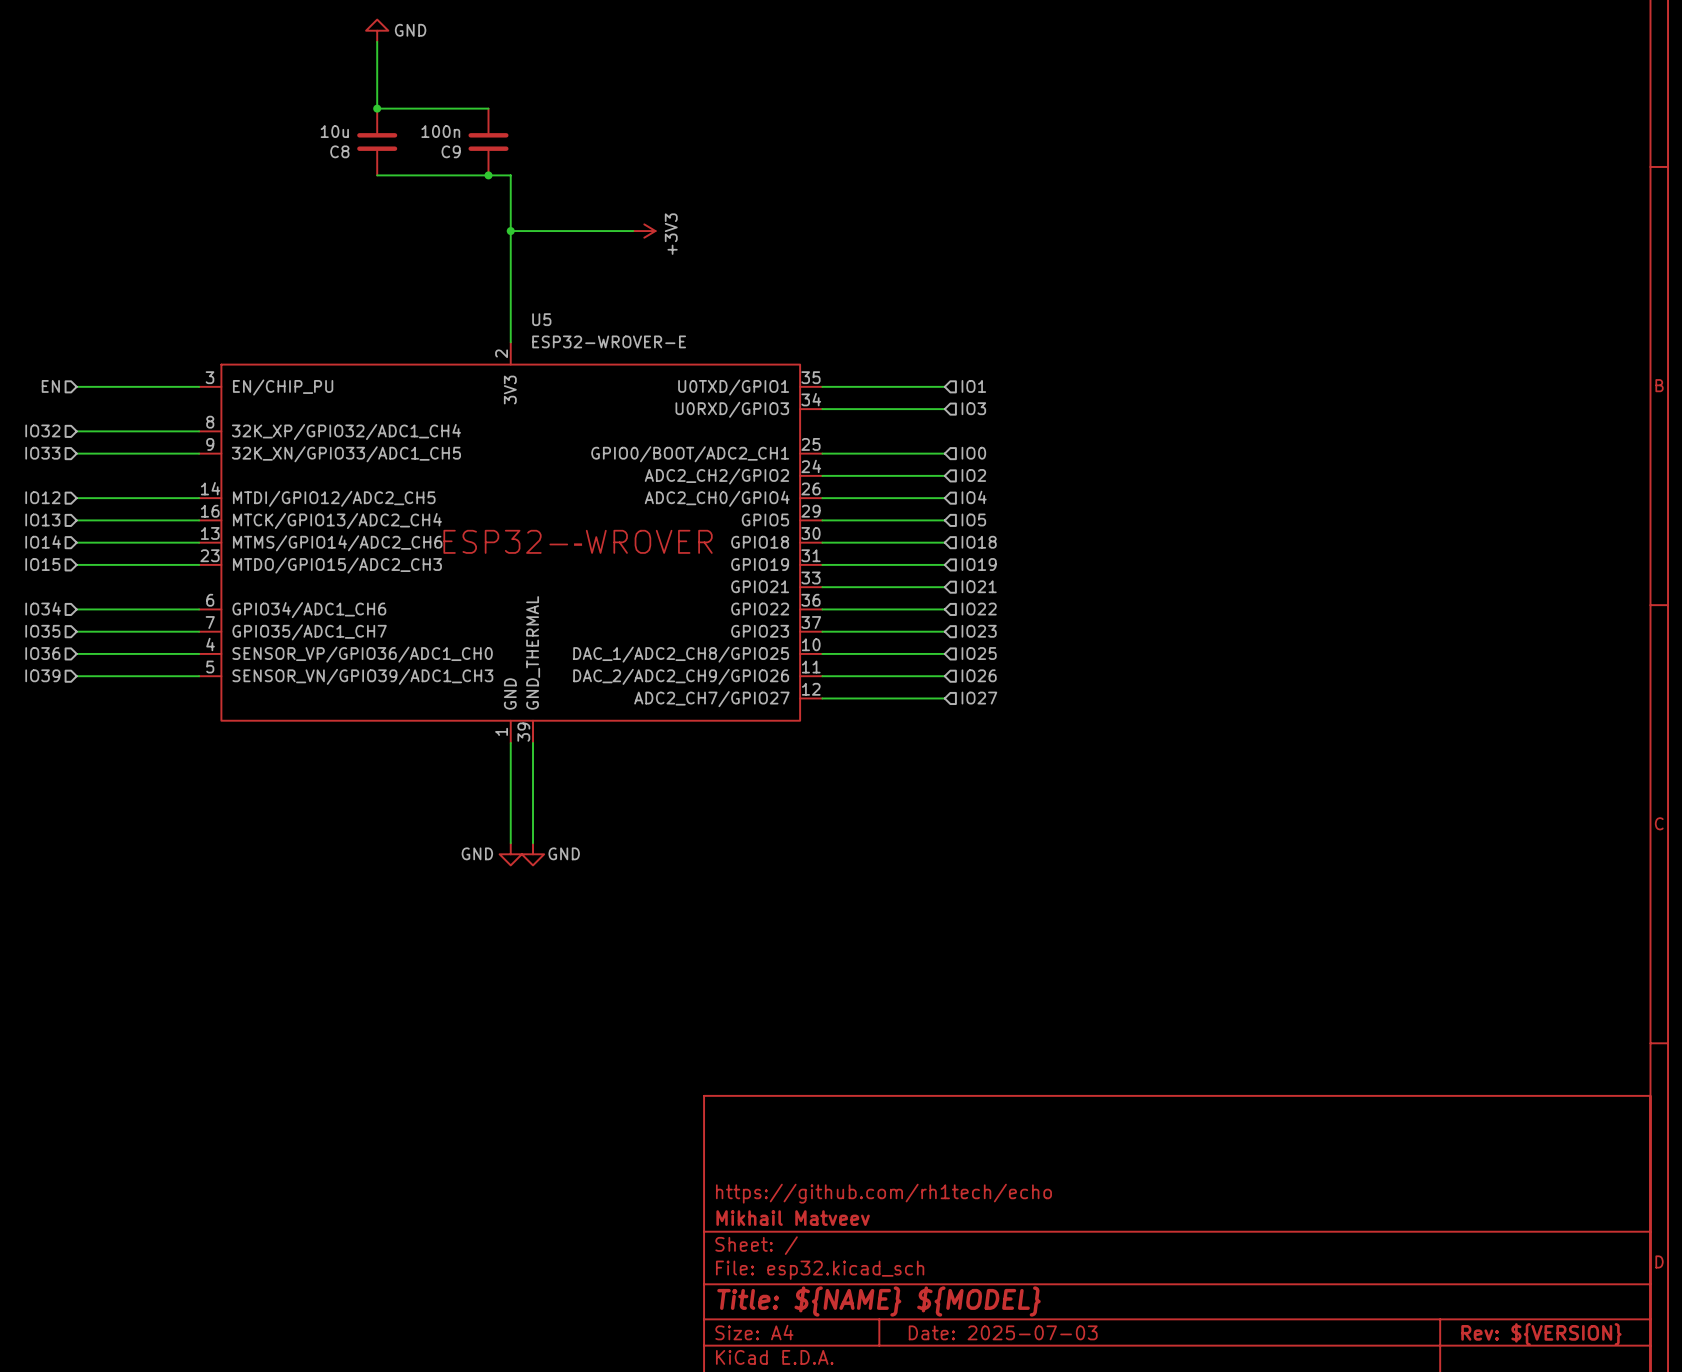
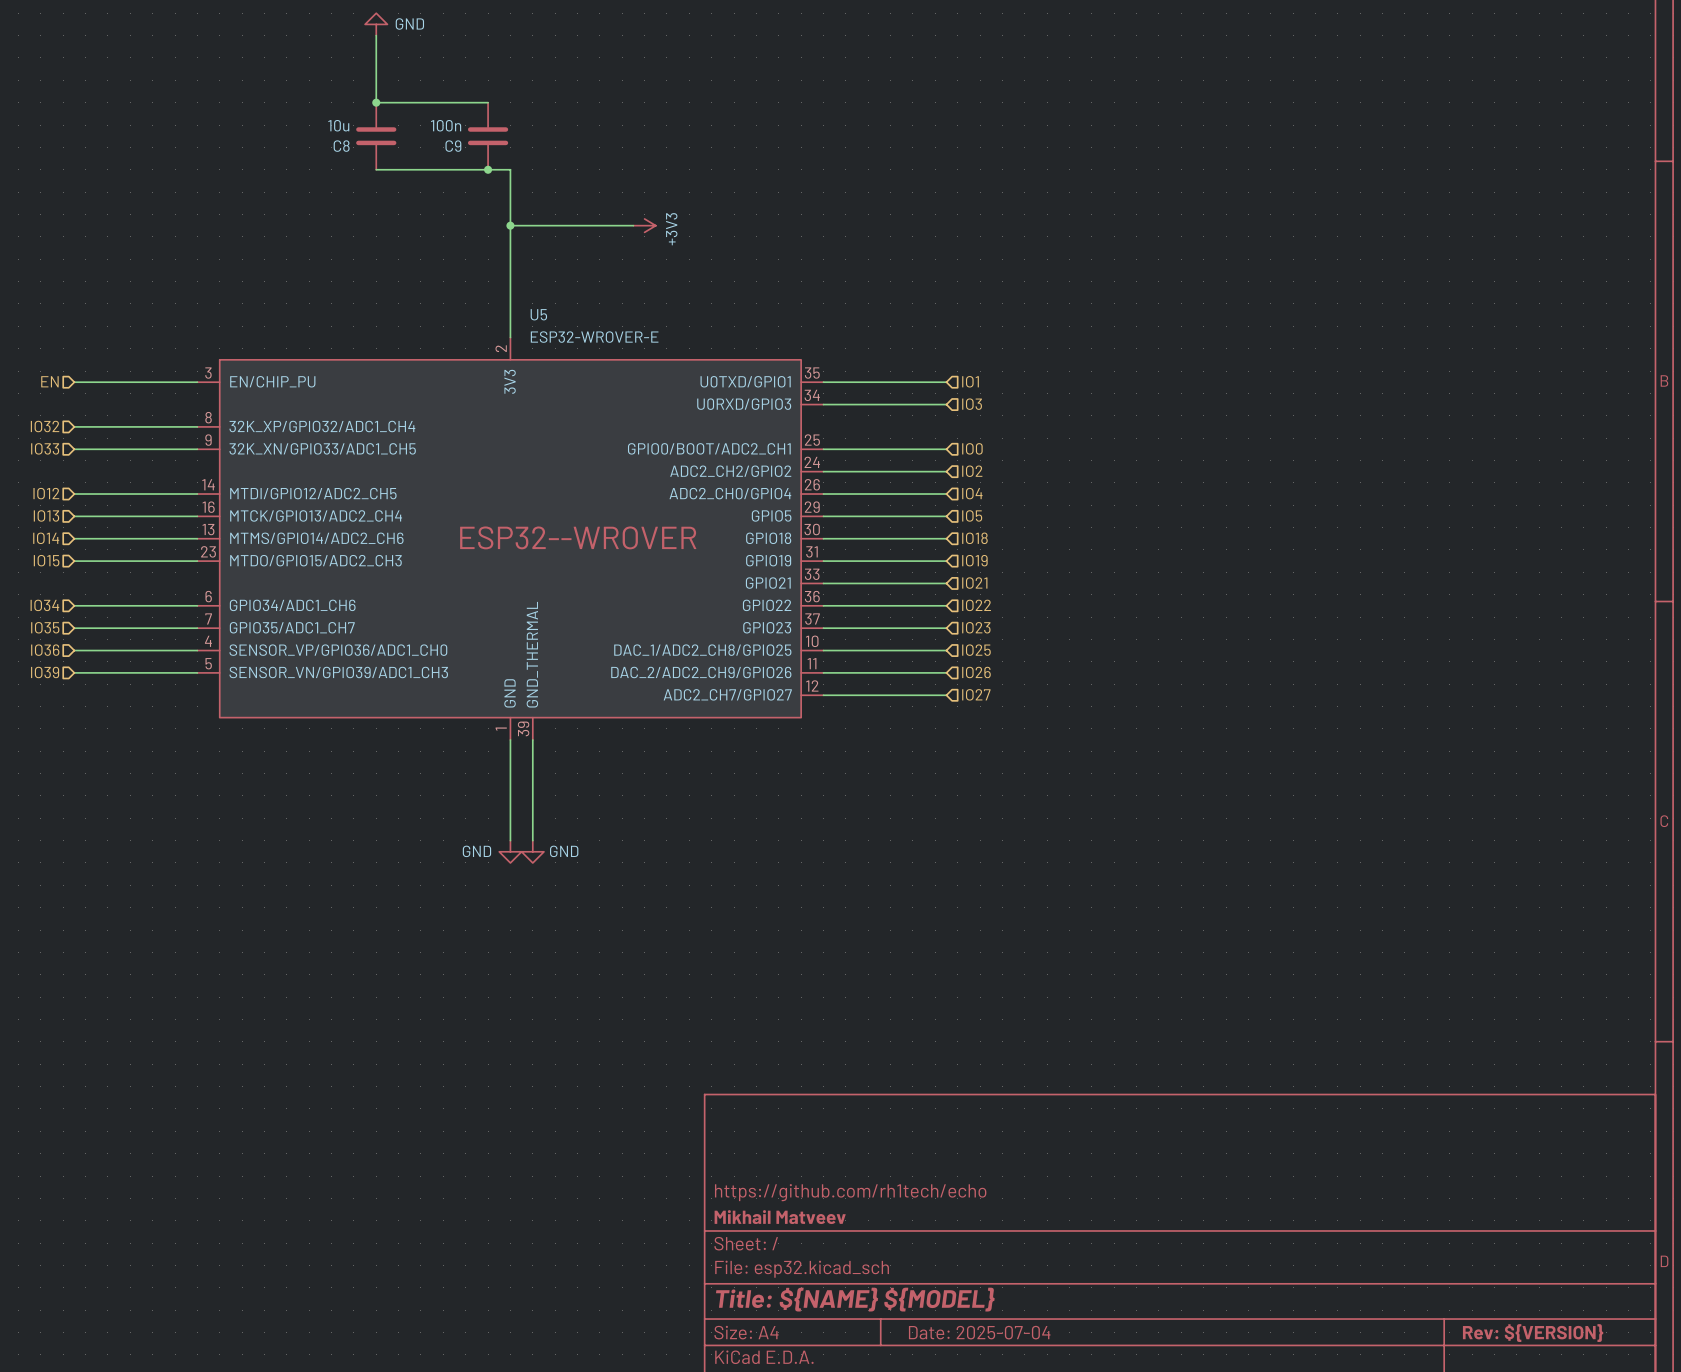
title block: Date: 2025-07-03 (1003, 1332) -> Date: 2025-07-04 (979, 1332)

